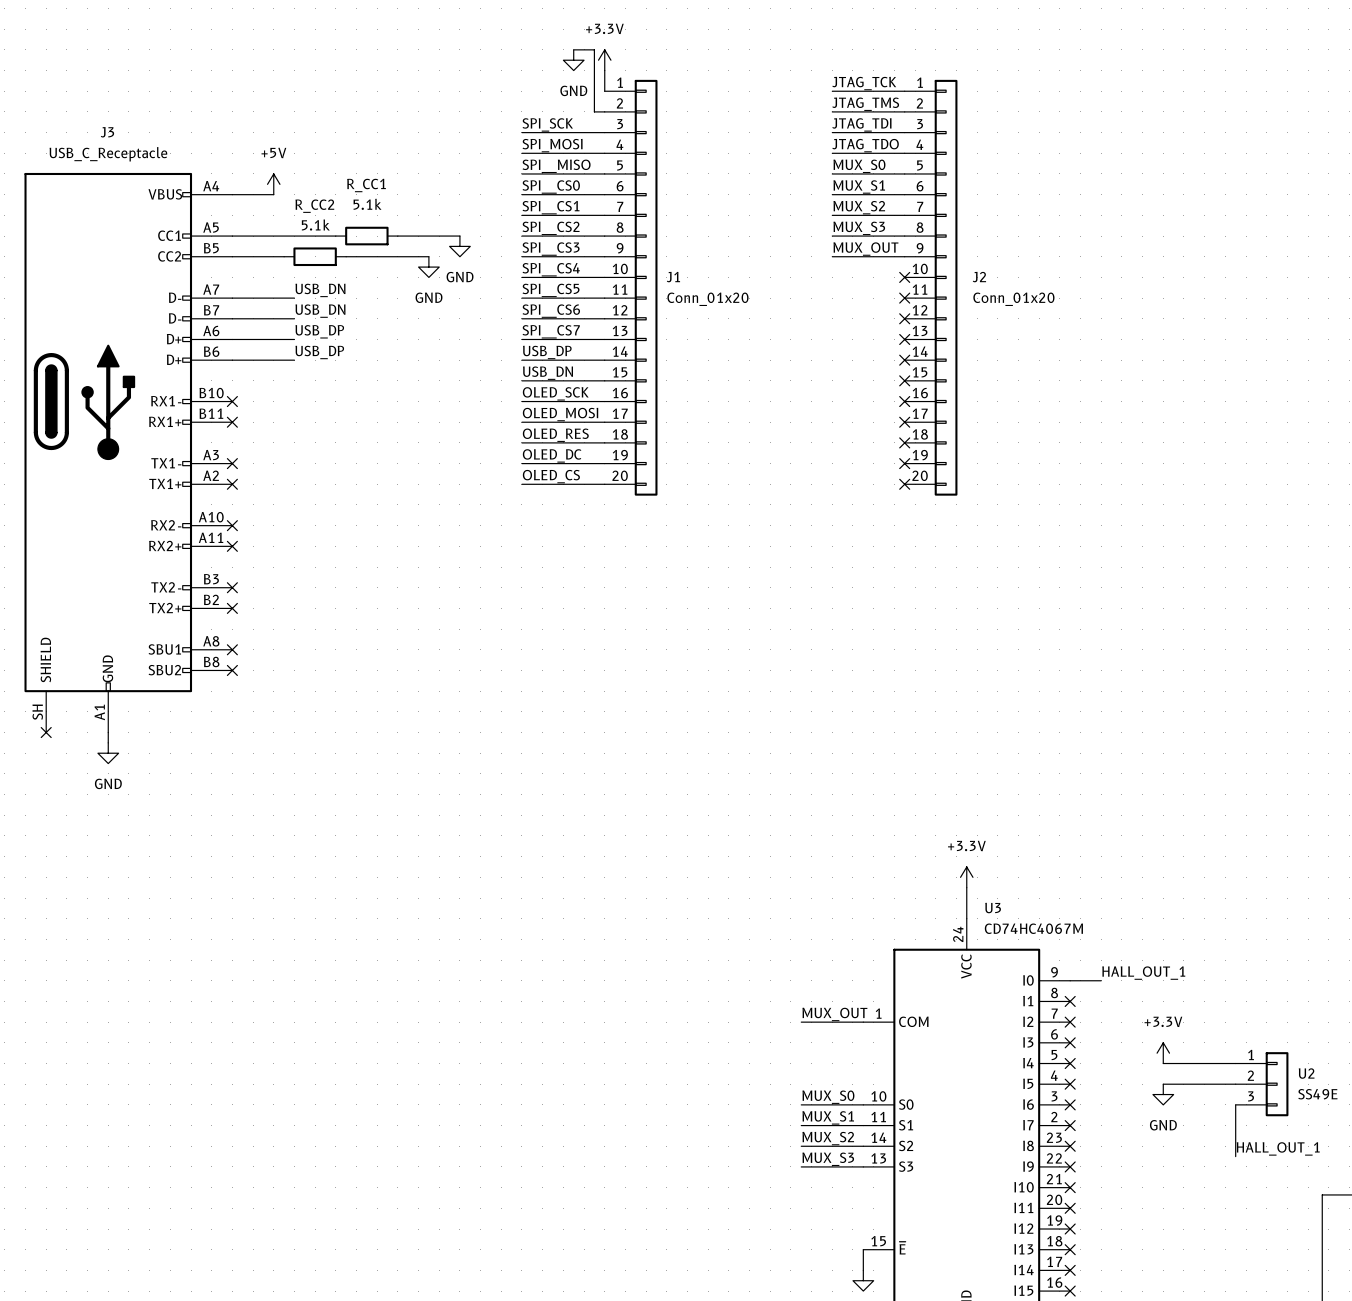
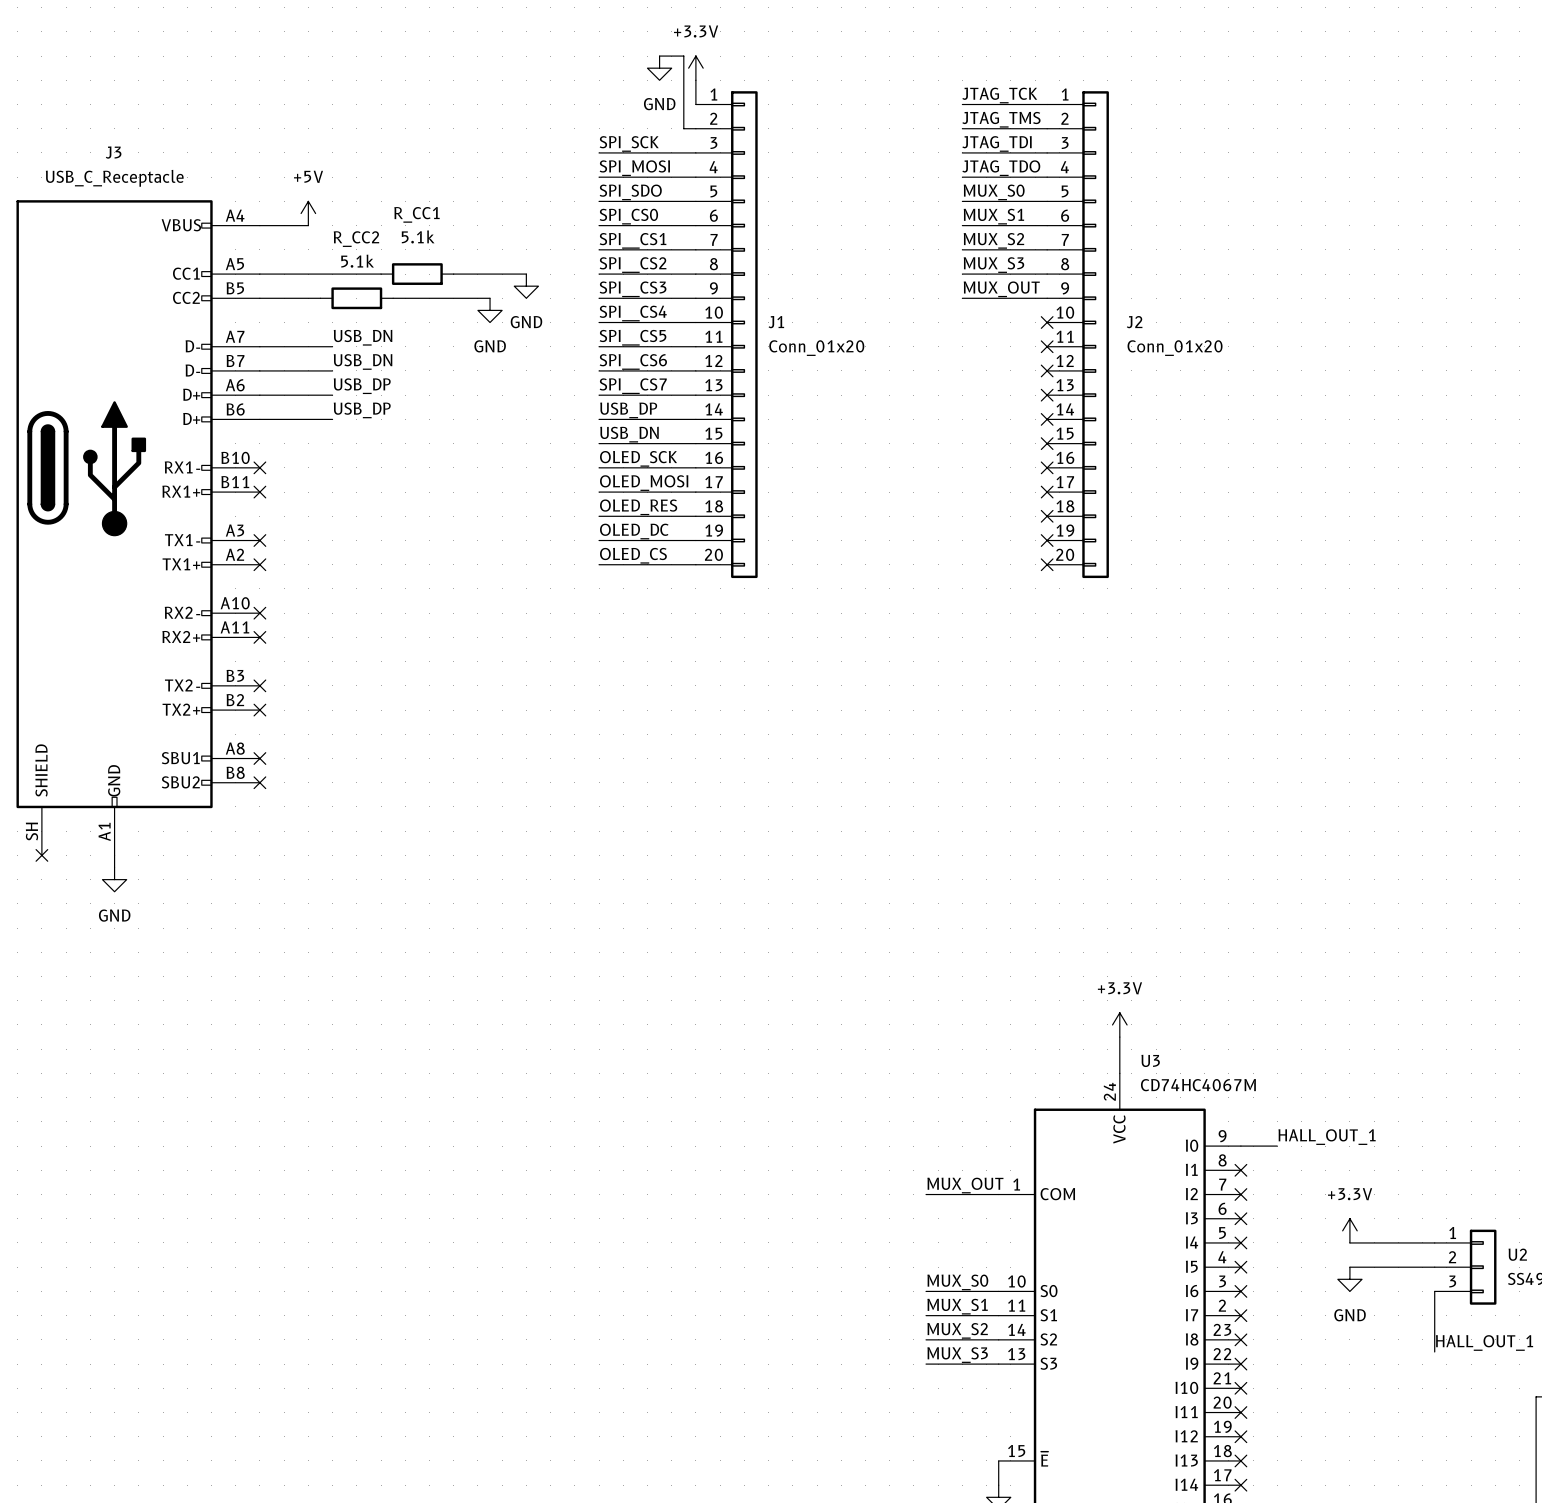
label: SPI__MISO (556, 166) -> SPI_SDO (630, 192)
label: SPI__CS0 (551, 186) -> SPI_CS0 (628, 216)

